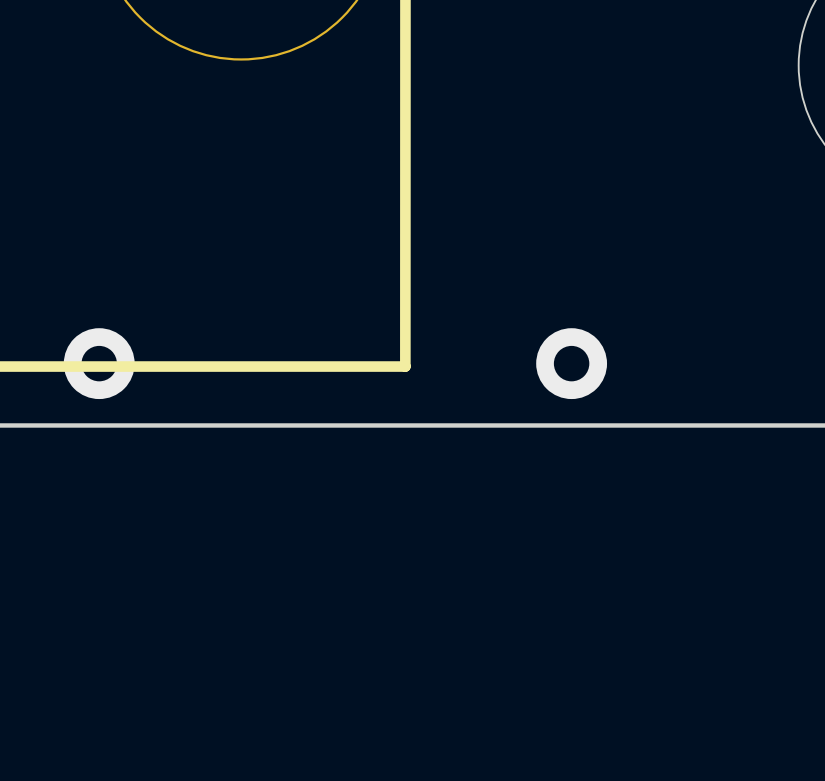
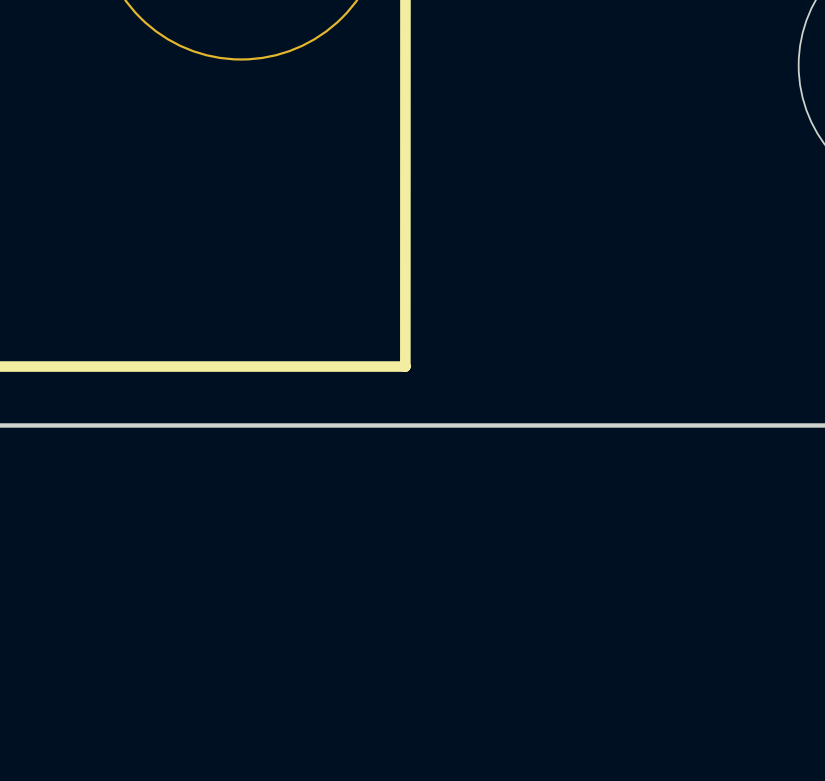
via: (99, 363) -> none
via: (571, 363) -> none

